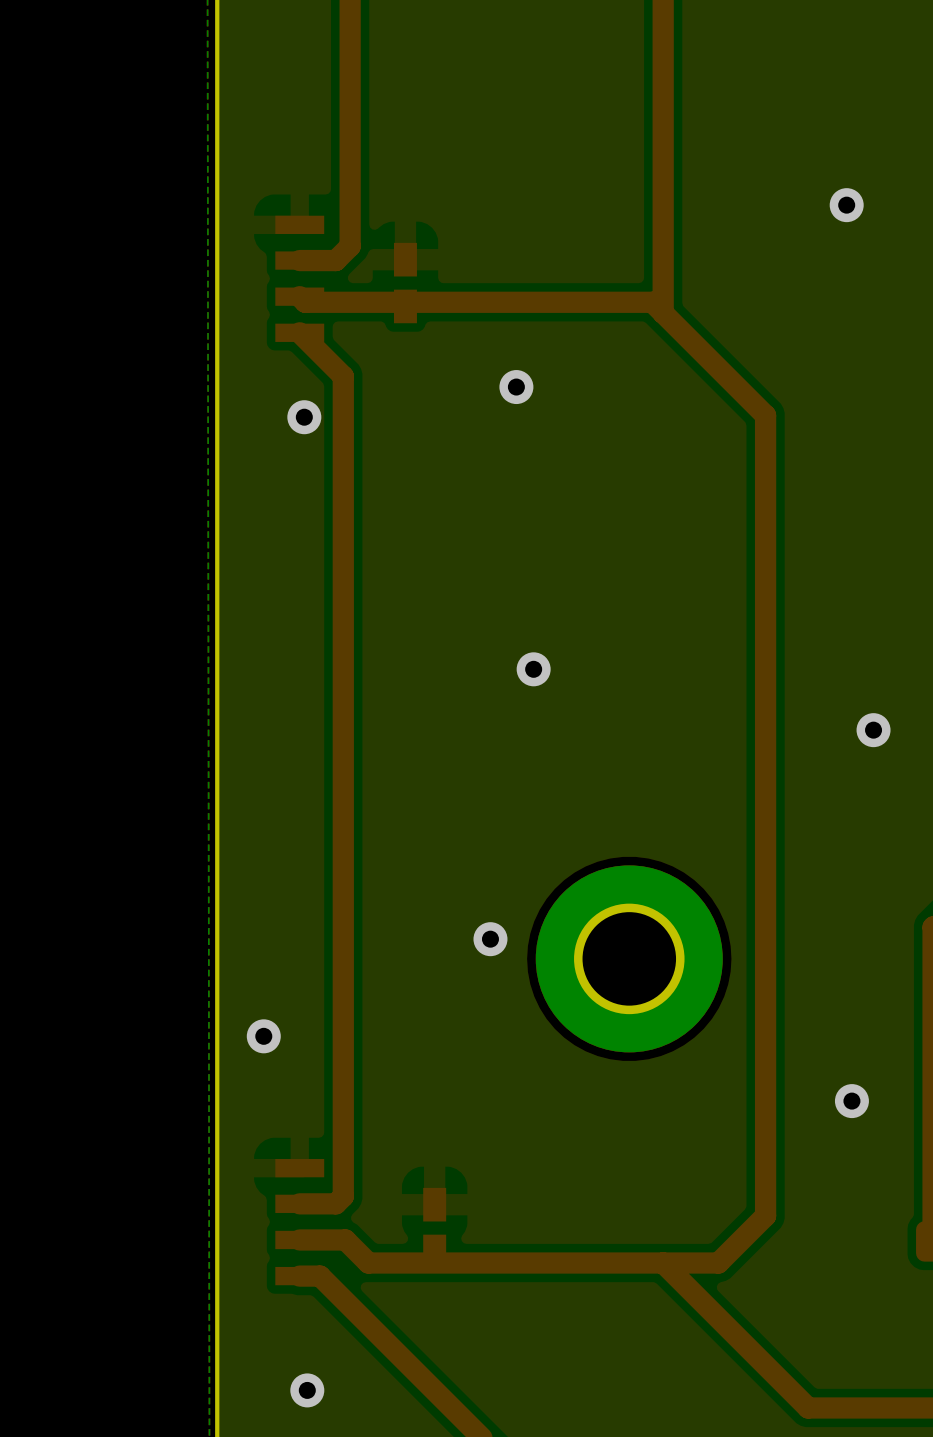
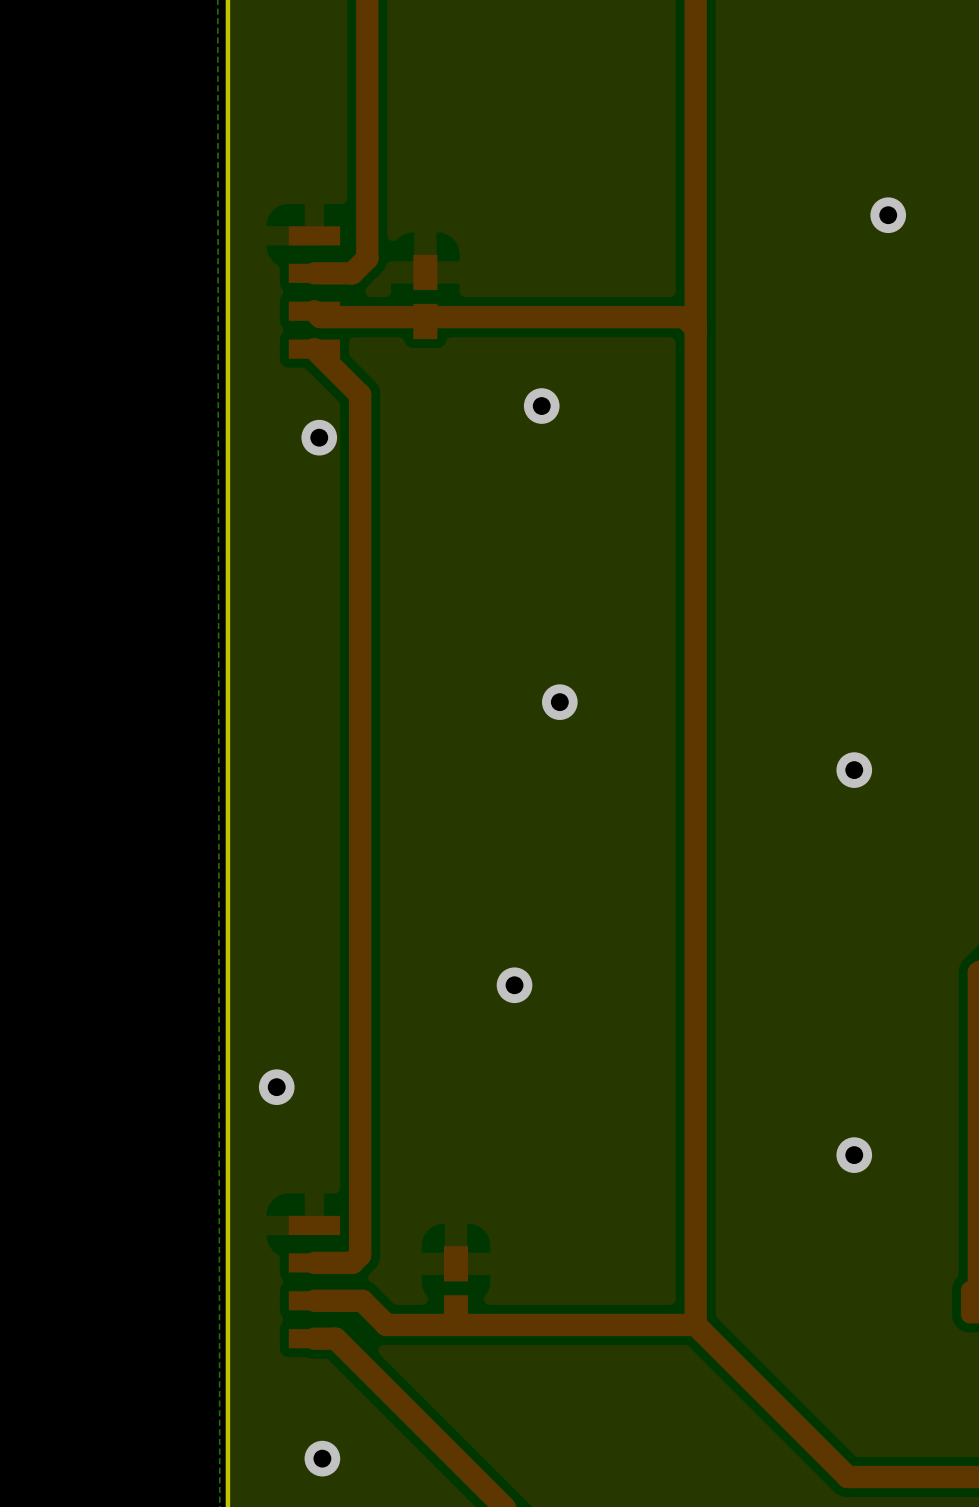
top track: (663, 313) (765, 415) (765, 1215) (718, 1263) (663, 1263) -> (695, 328) (695, 1324)
via position: (873, 730) -> (854, 770)
part: (629, 958) -> none
via position: (851, 1101) -> (854, 1155)

